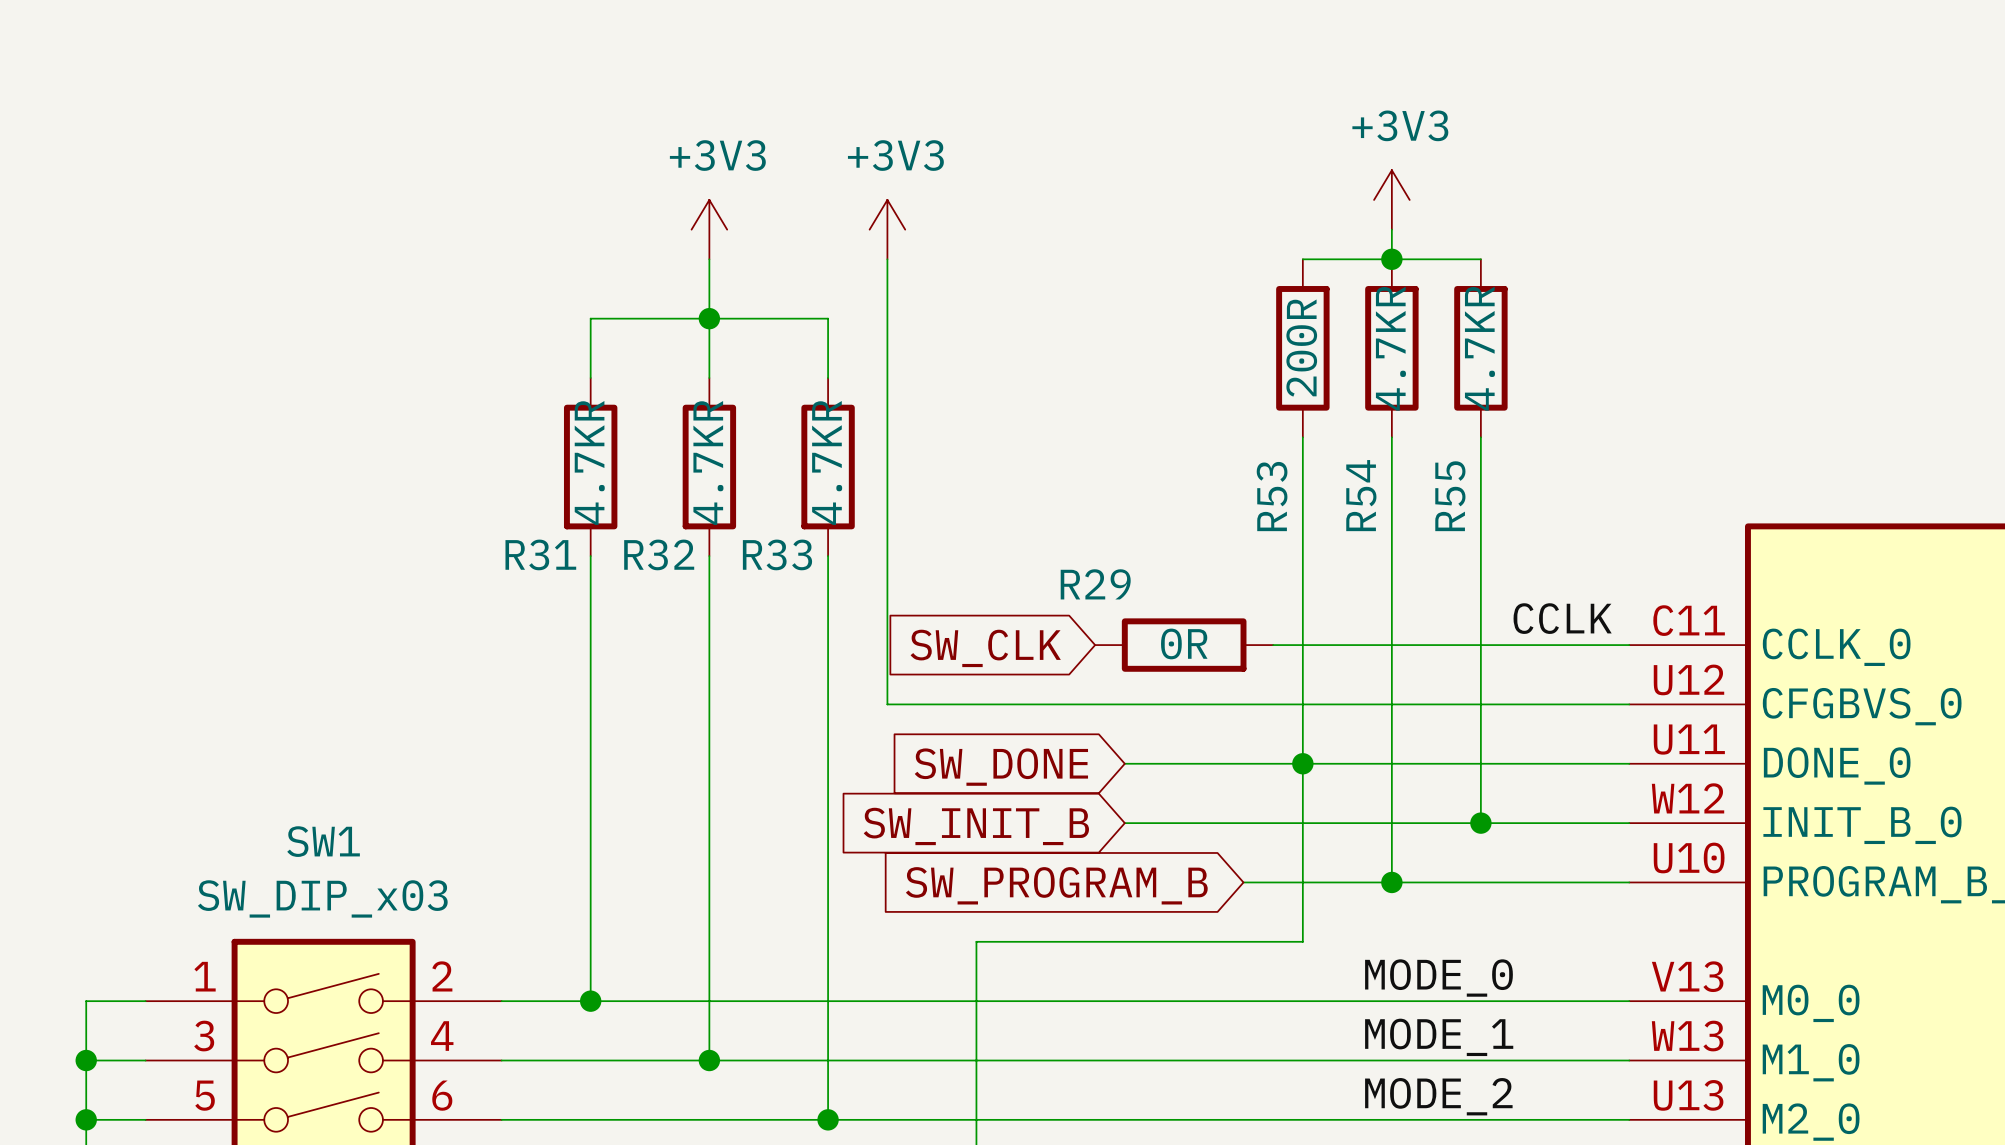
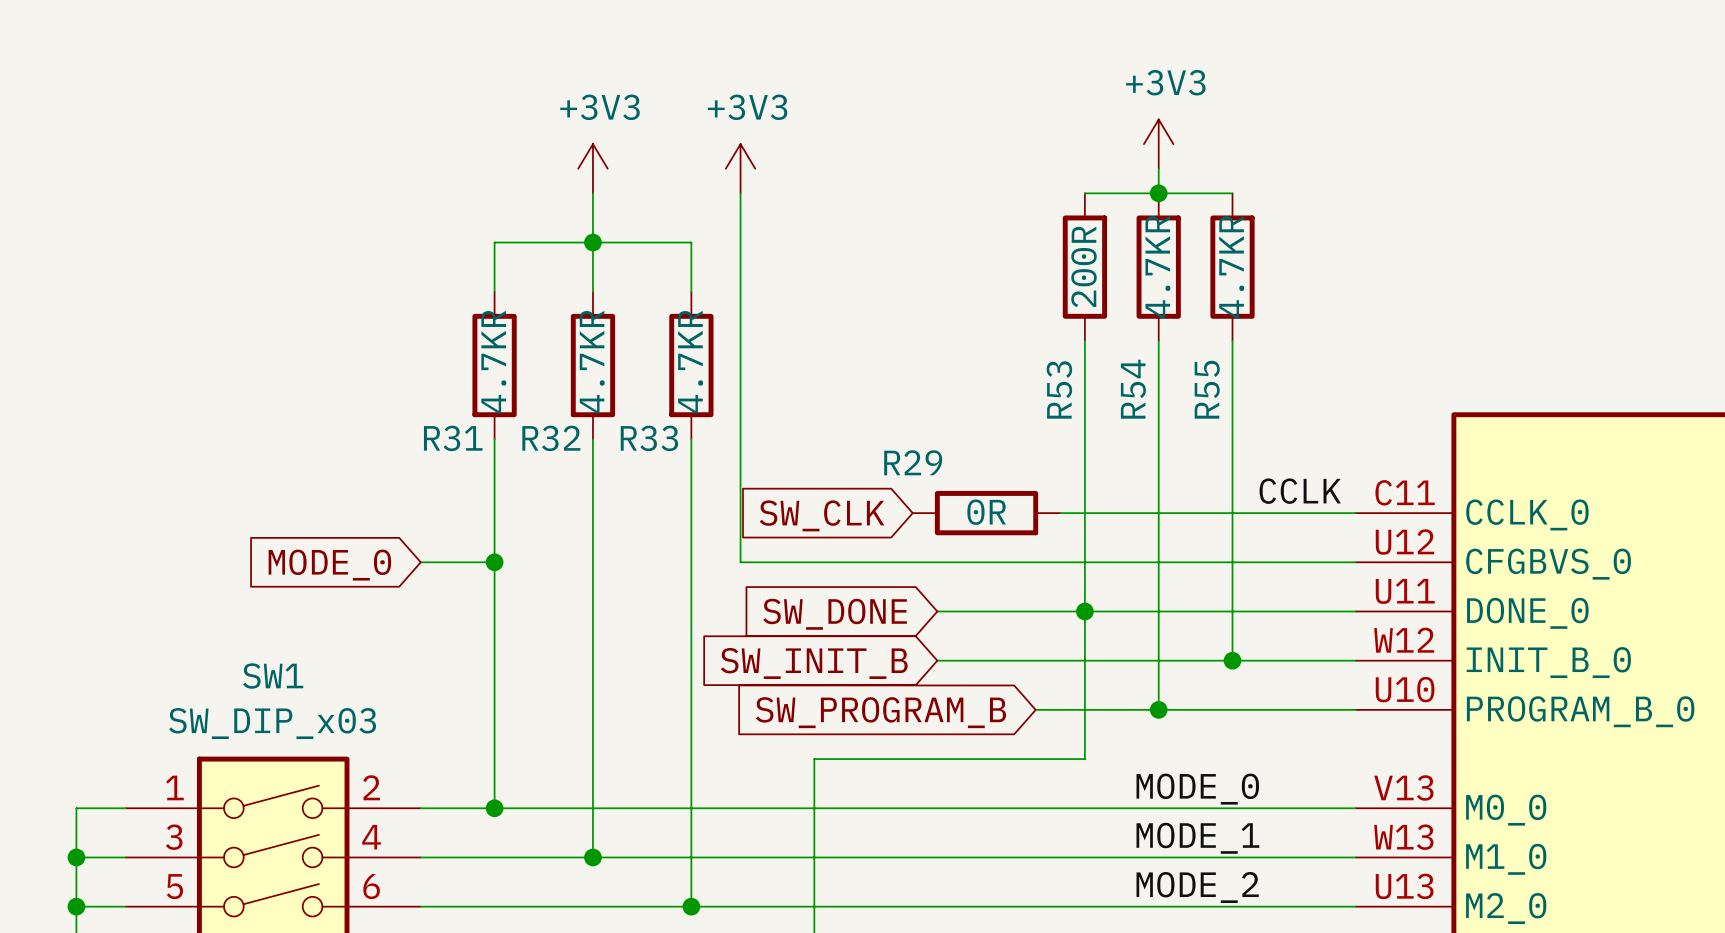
wire: none -> (420, 562) (494, 562)
junction: none -> (494, 562)
global label: none -> MODE_0 (329, 565)

